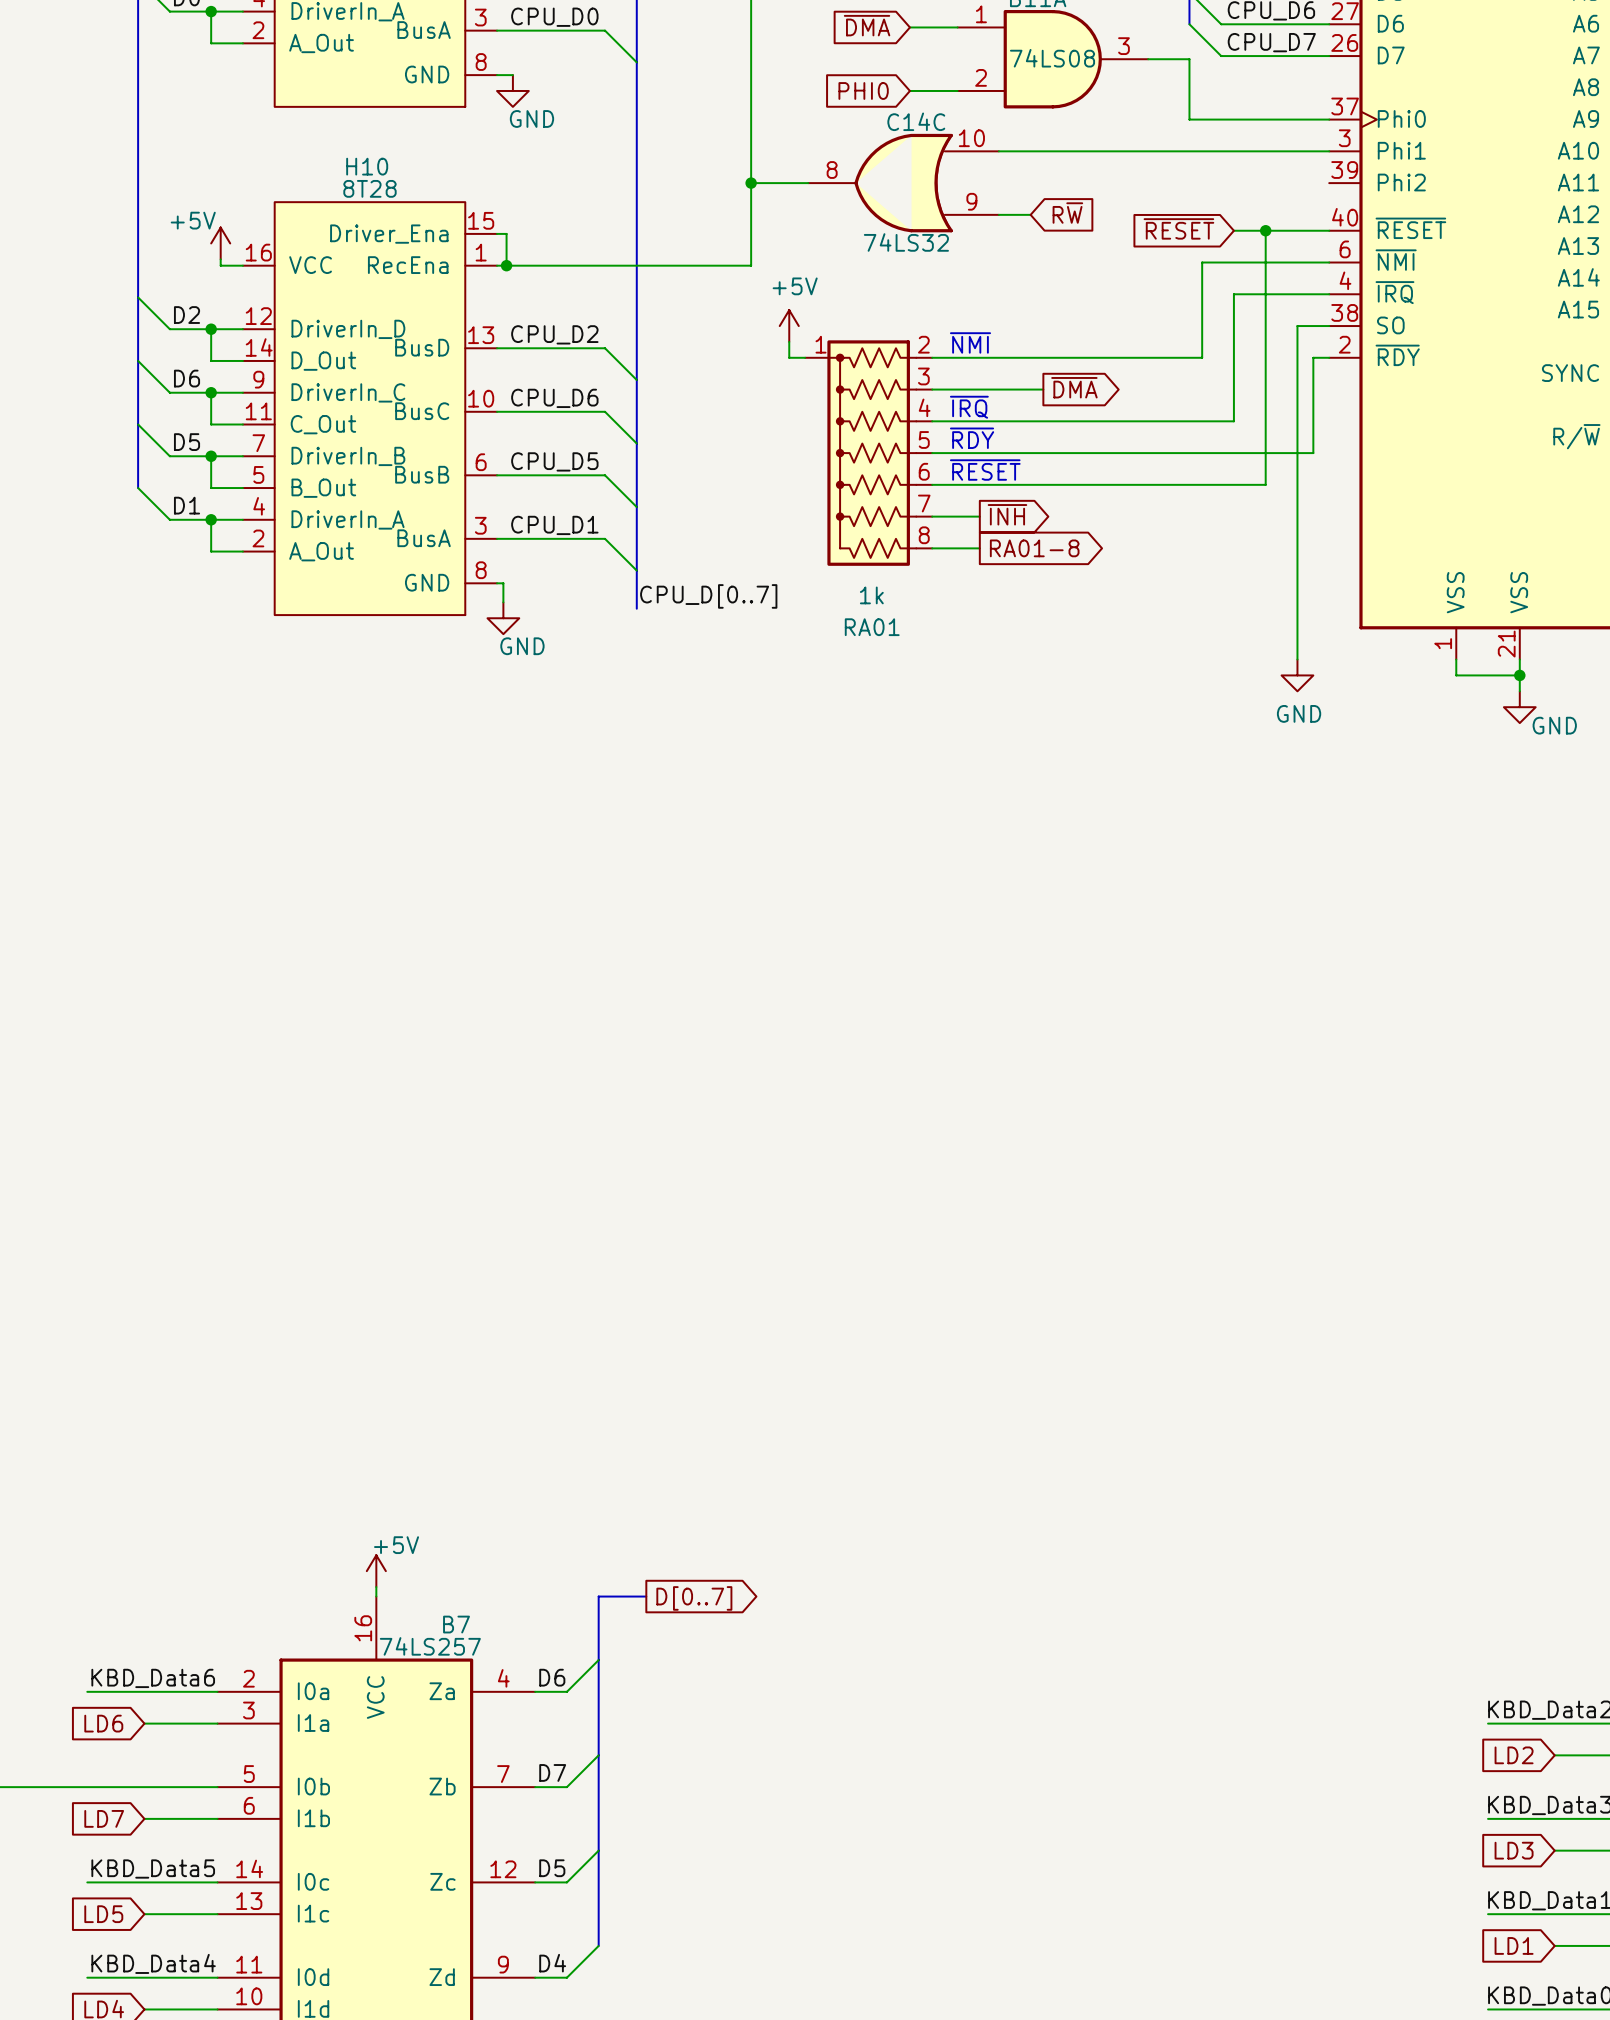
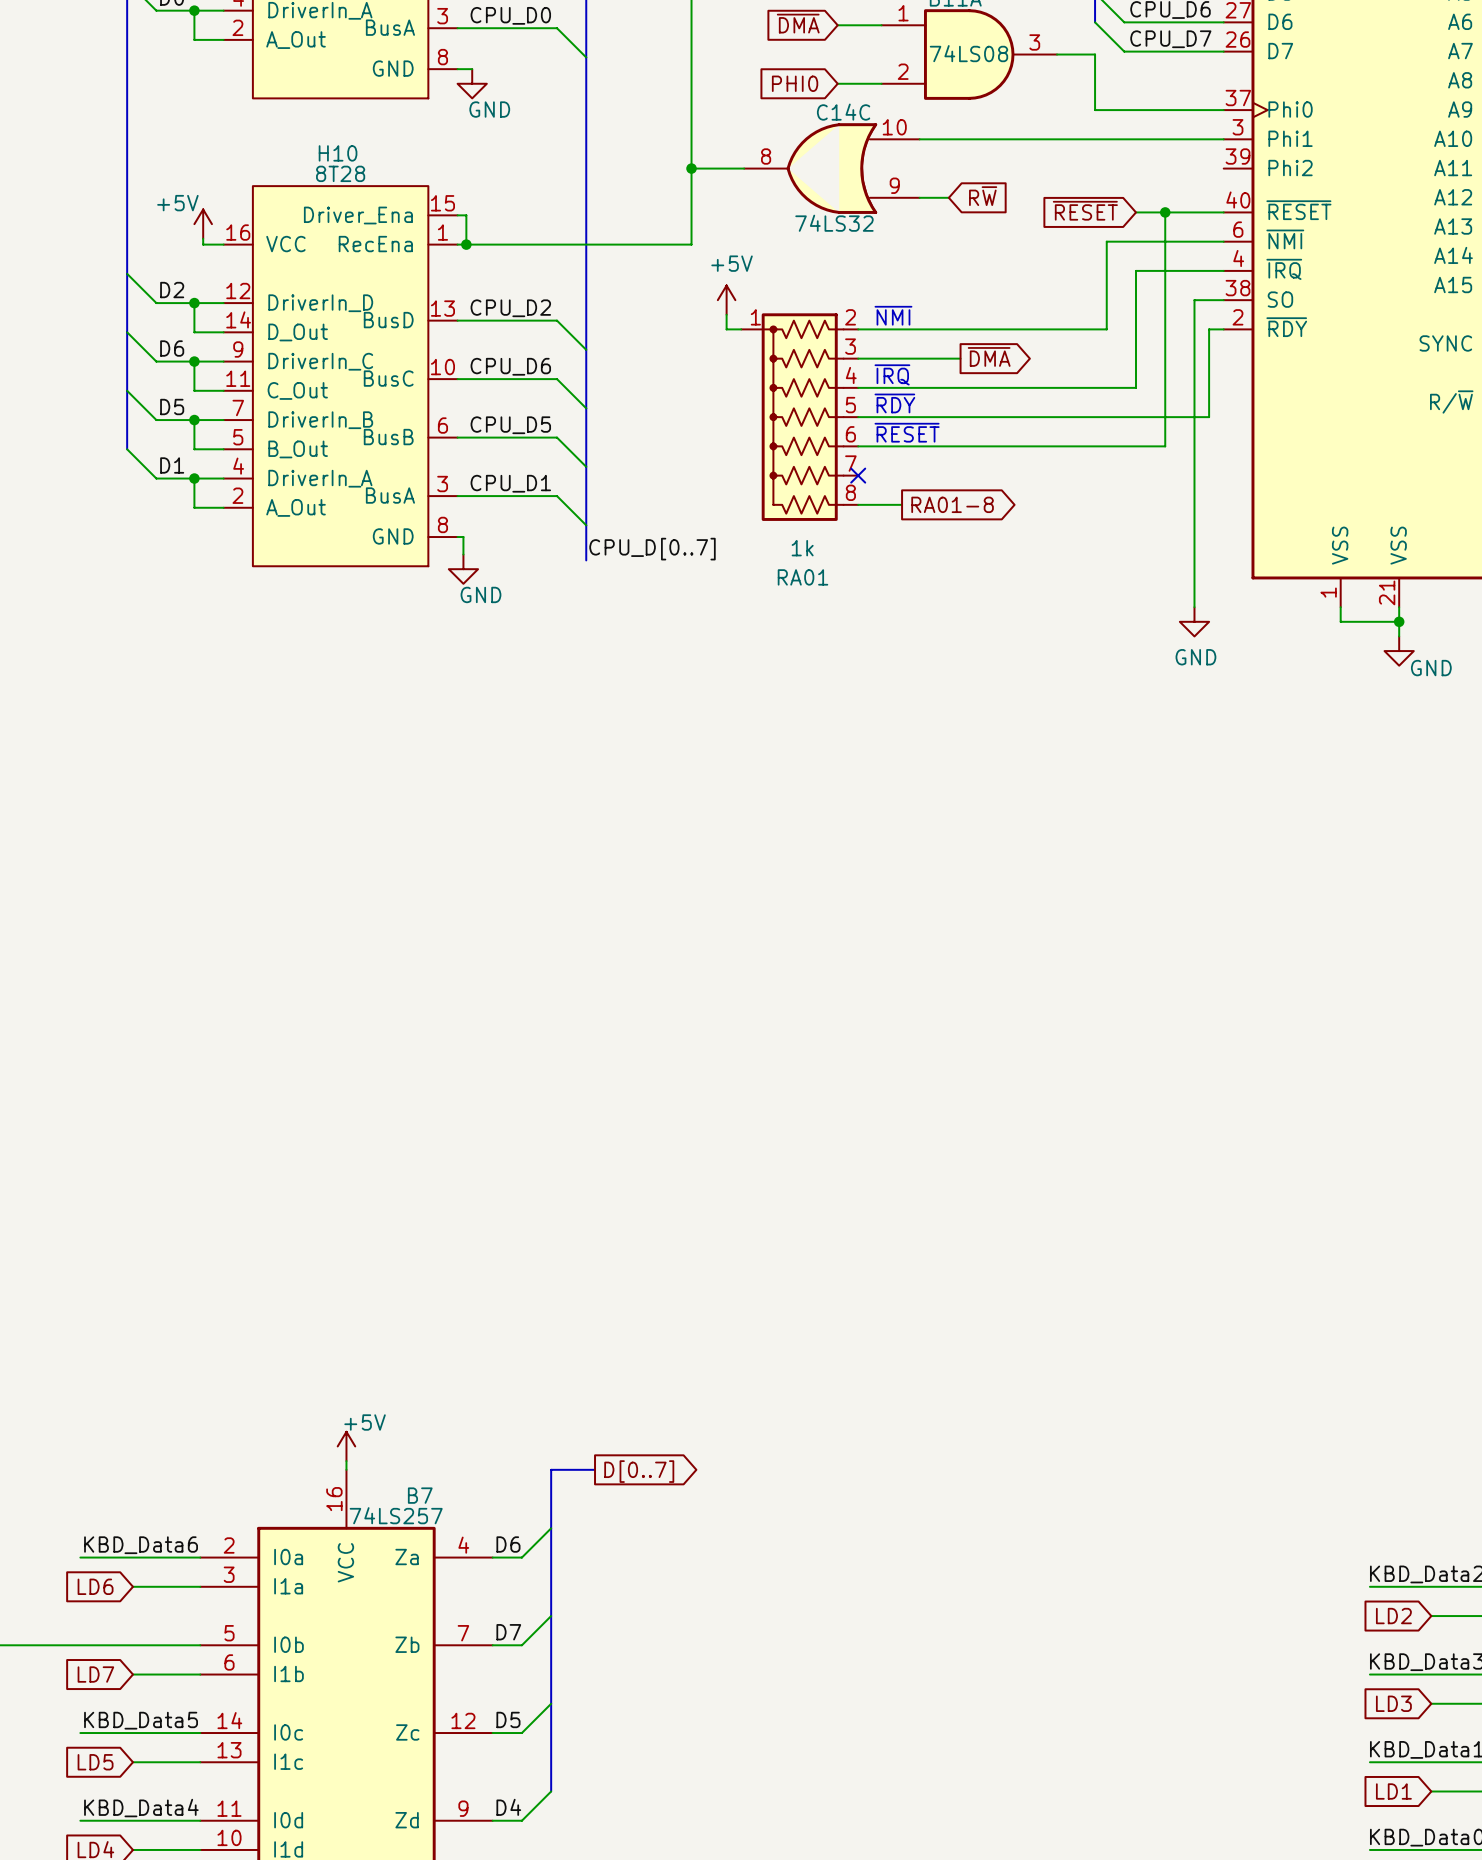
global label: ~{INH} (1007, 514) -> none
wire: (932, 516) (979, 516) -> none
no-connect mark: none -> (858, 475)

